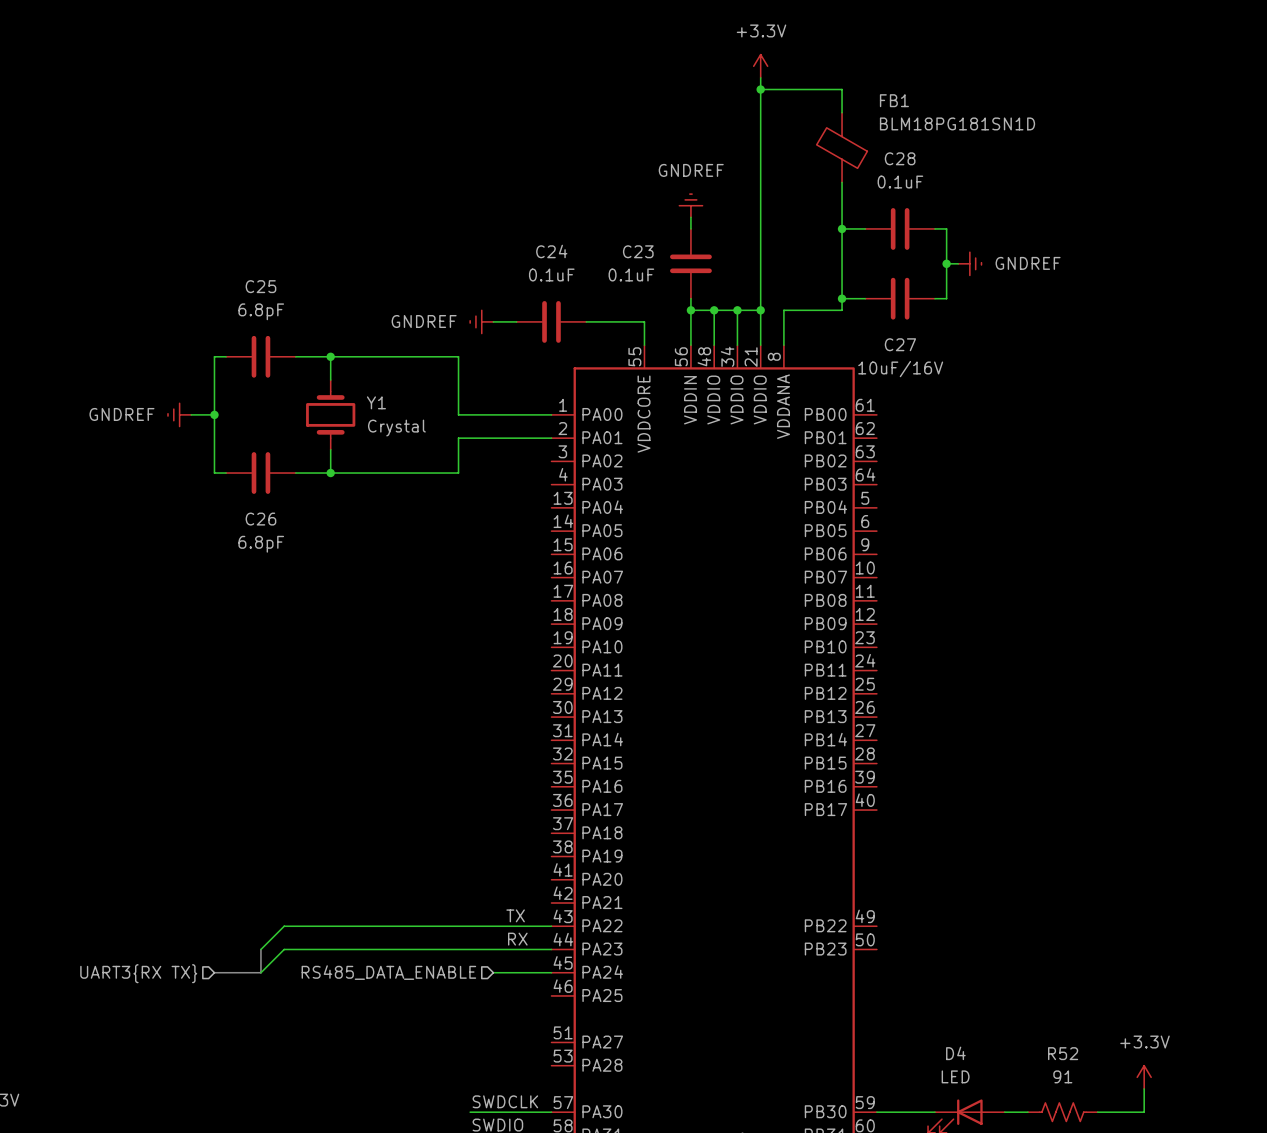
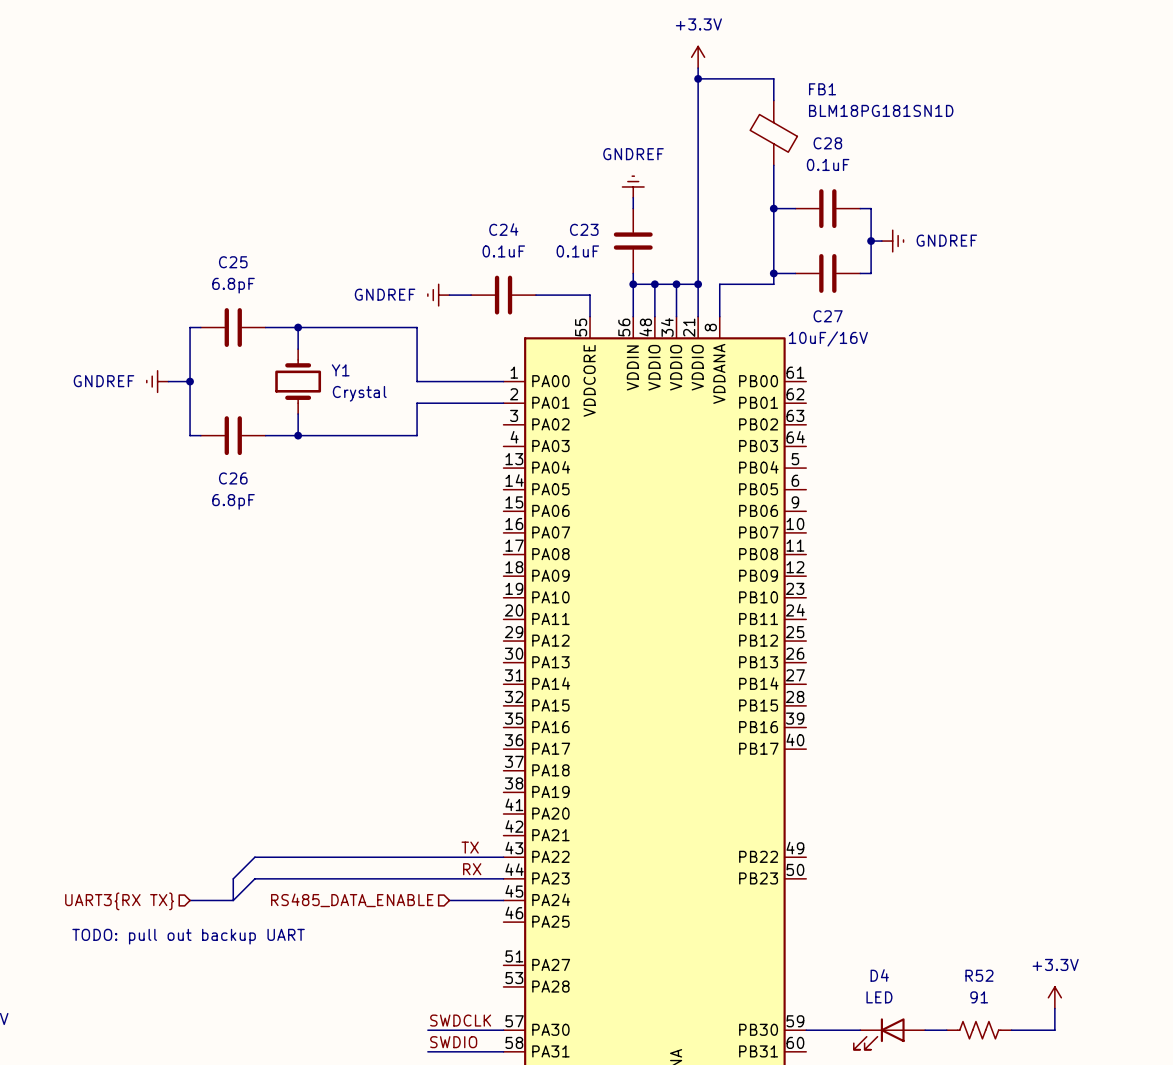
text: none -> TODO: pull out backup UART (188, 936)

